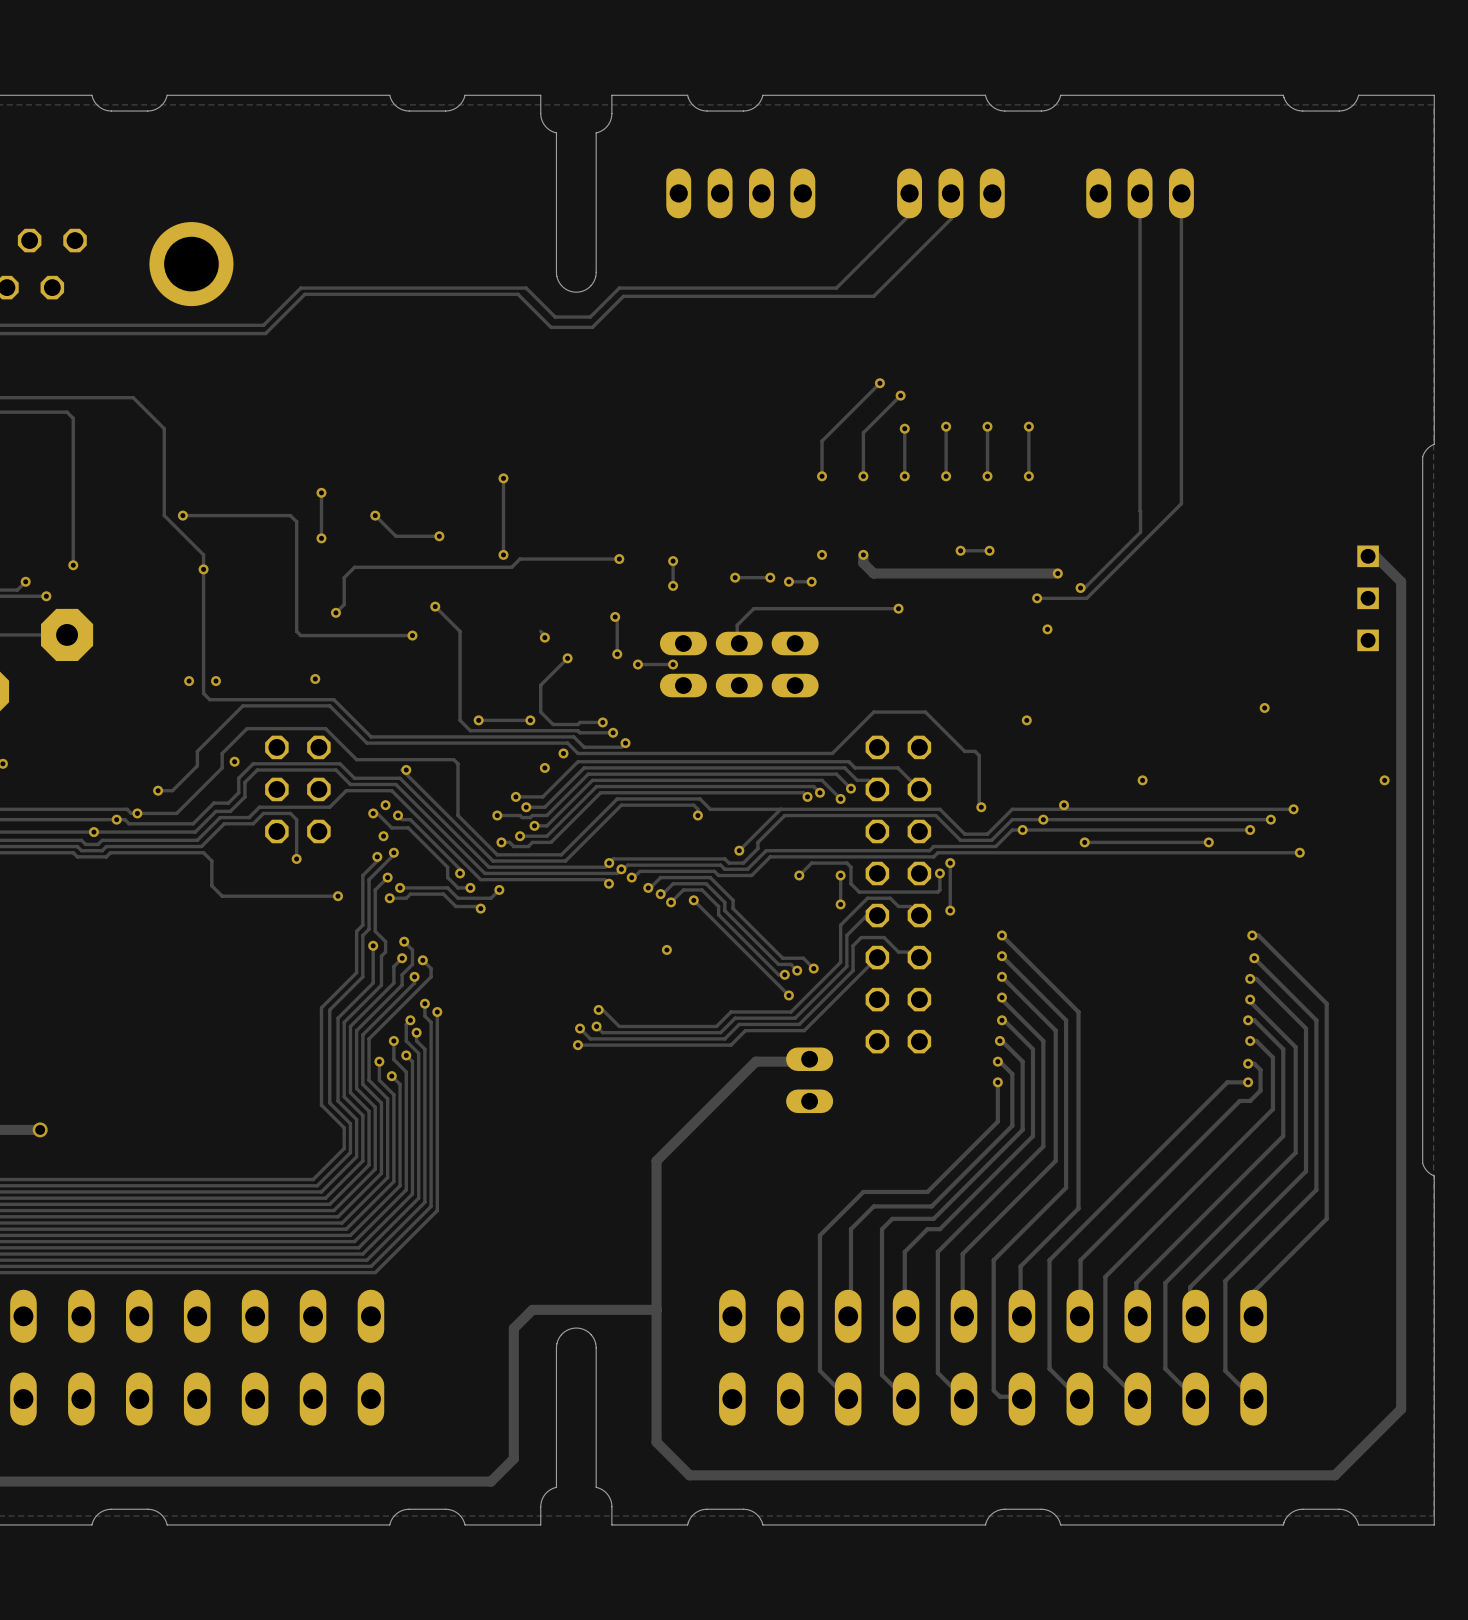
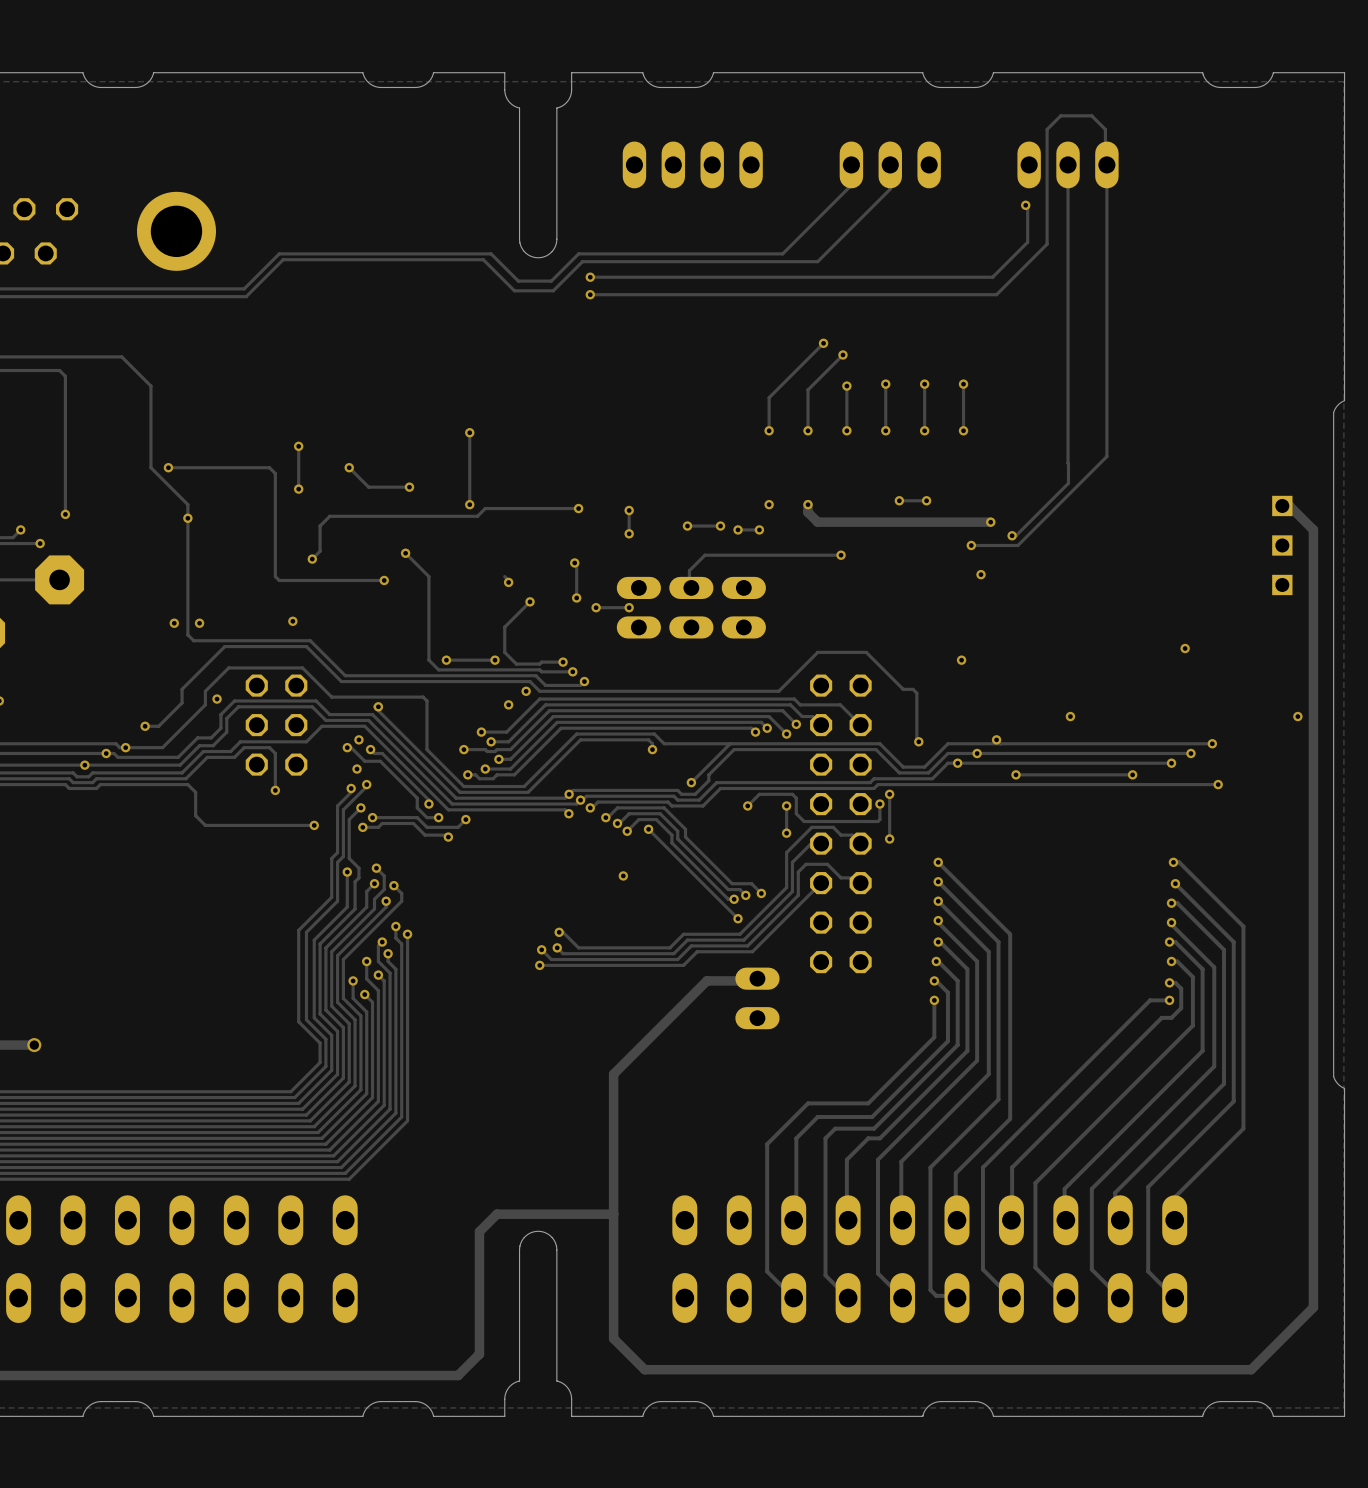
track: none -> (1106, 164) (1105, 129) (1091, 115) (1060, 115) (1047, 129) (1047, 244) (996, 294) (590, 294)
track: none -> (1025, 205) (1027, 207) (1027, 242) (992, 277) (590, 277)
via: none -> (1025, 205)
via: none -> (590, 277)
via: none -> (590, 294)

